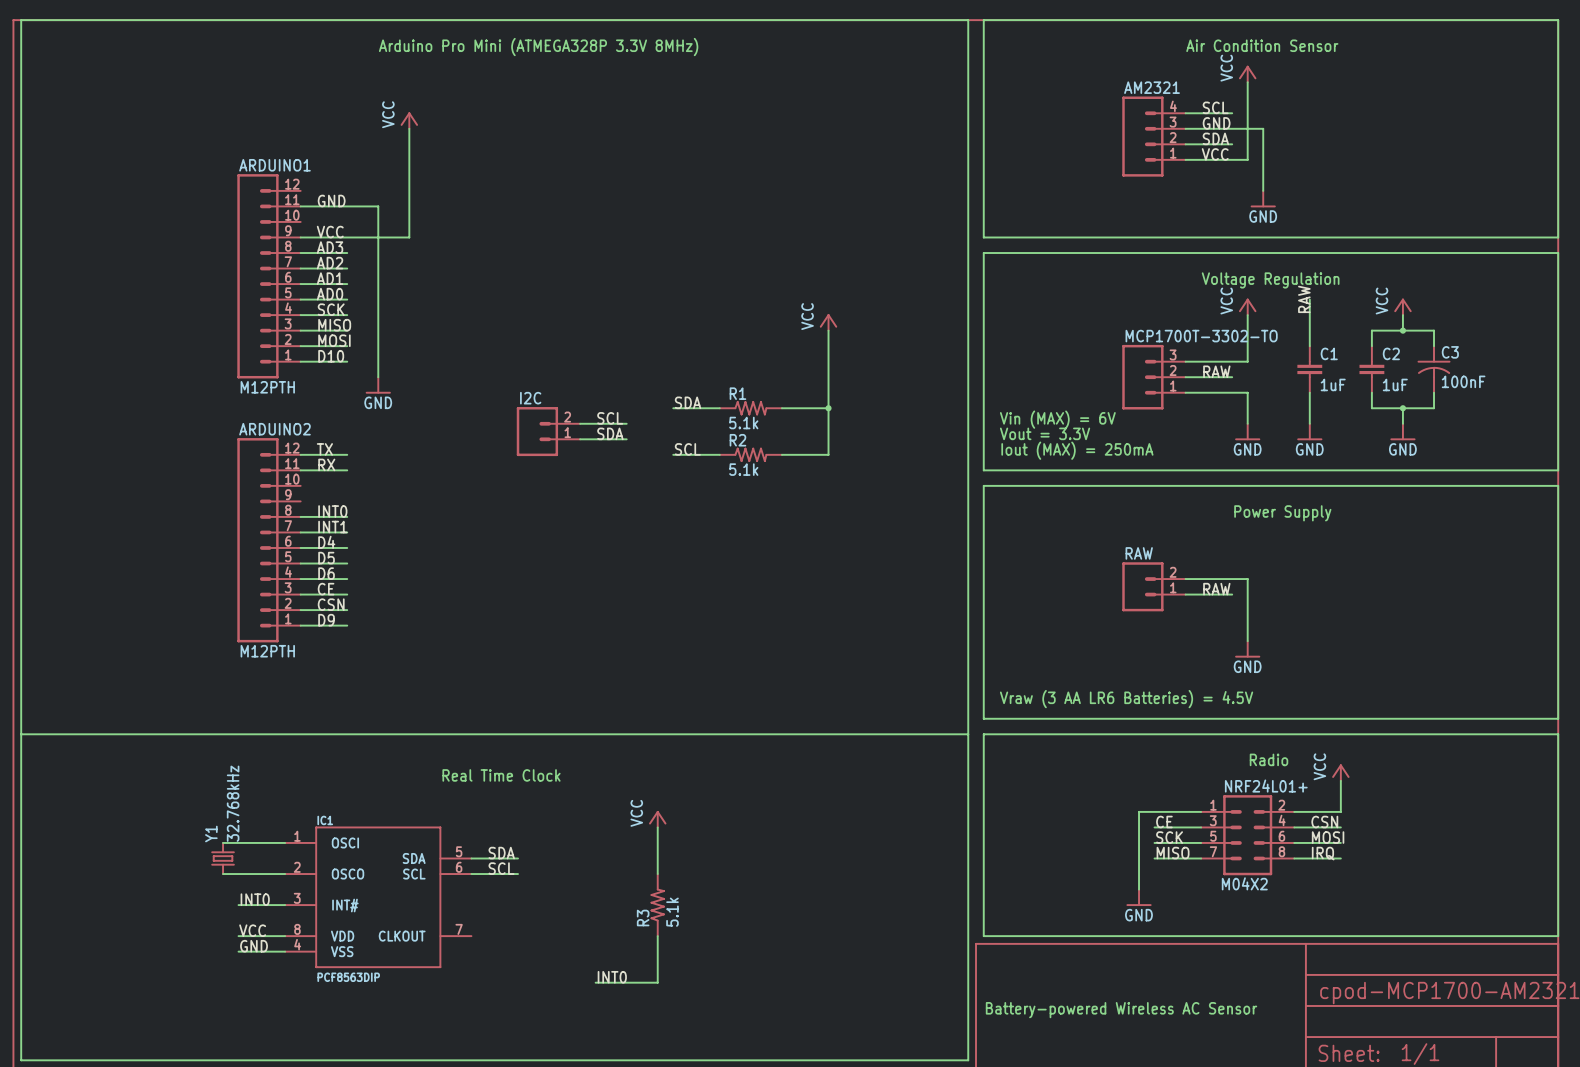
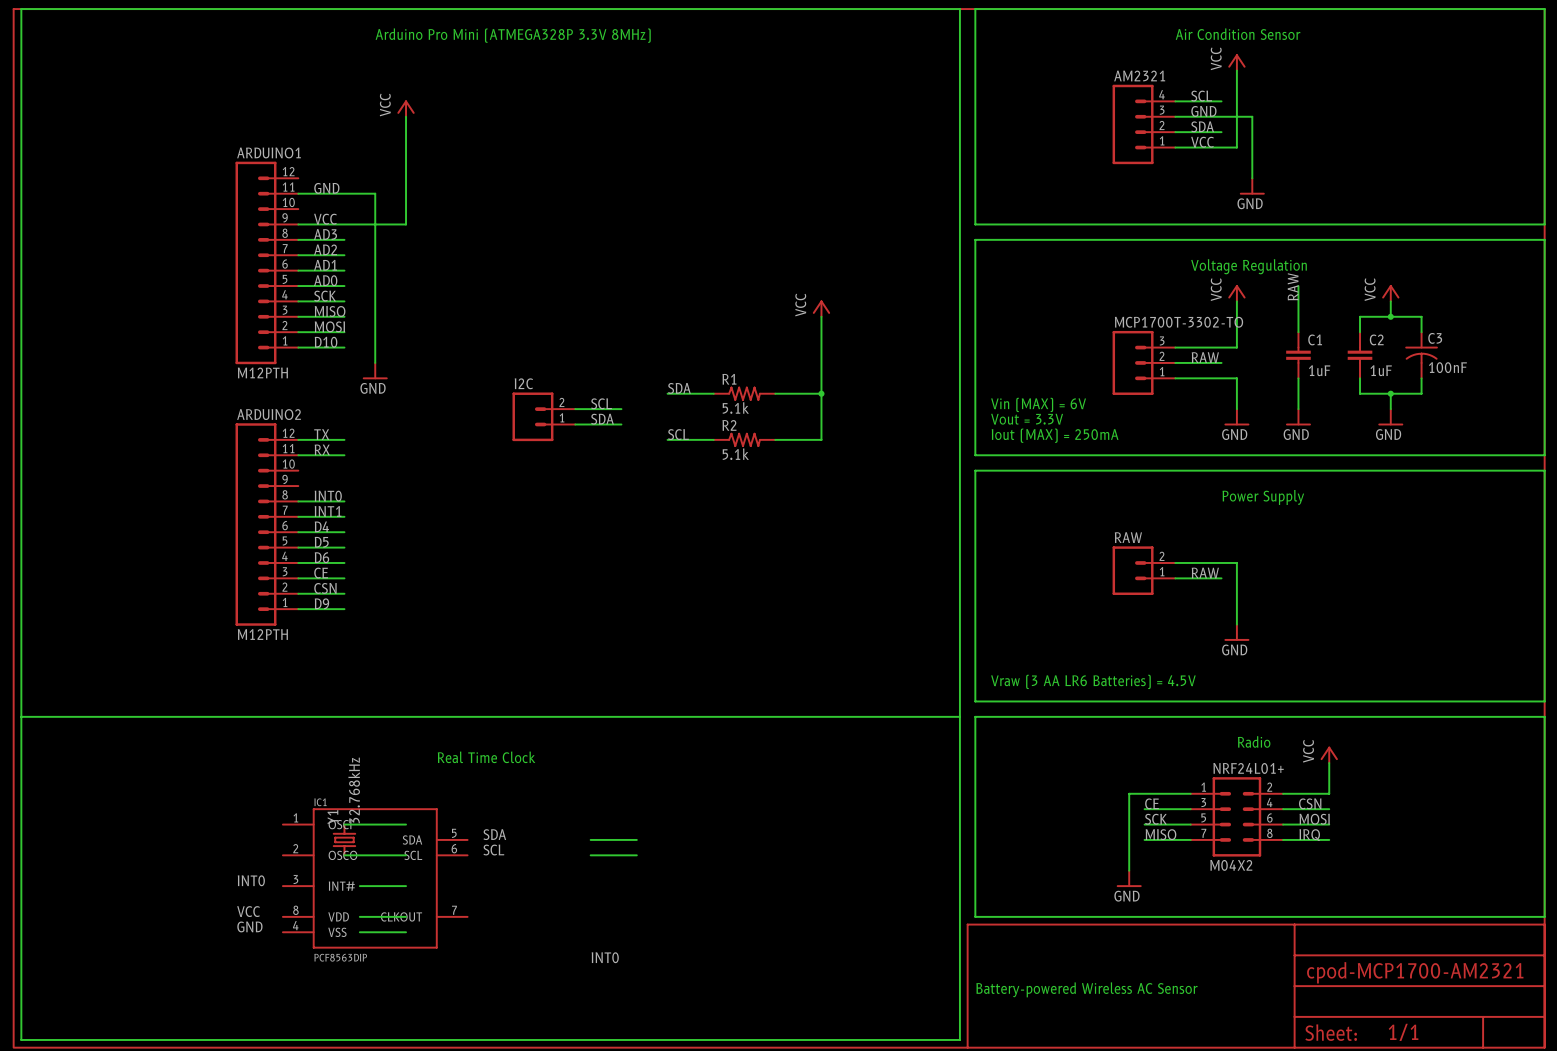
power symbol: VCC (657, 819) -> none
wire: (657, 827) (657, 874) -> none
wire: (223, 842) (285, 842) -> (344, 824) (406, 824)
Y1 position: (223, 858) -> (344, 839)
wire: (471, 858) (518, 858) -> (590, 839) (636, 839)
wire: (223, 874) (285, 874) -> (344, 855) (406, 855)
wire: (471, 874) (518, 874) -> (590, 855) (636, 855)
wire: (238, 905) (285, 905) -> (359, 886) (406, 886)
R3: 5.1k (657, 905) -> none
wire: (238, 936) (285, 936) -> (359, 916) (406, 916)
wire: (657, 936) (657, 982) (595, 982) -> none
wire: (238, 951) (285, 951) -> (359, 932) (406, 932)

